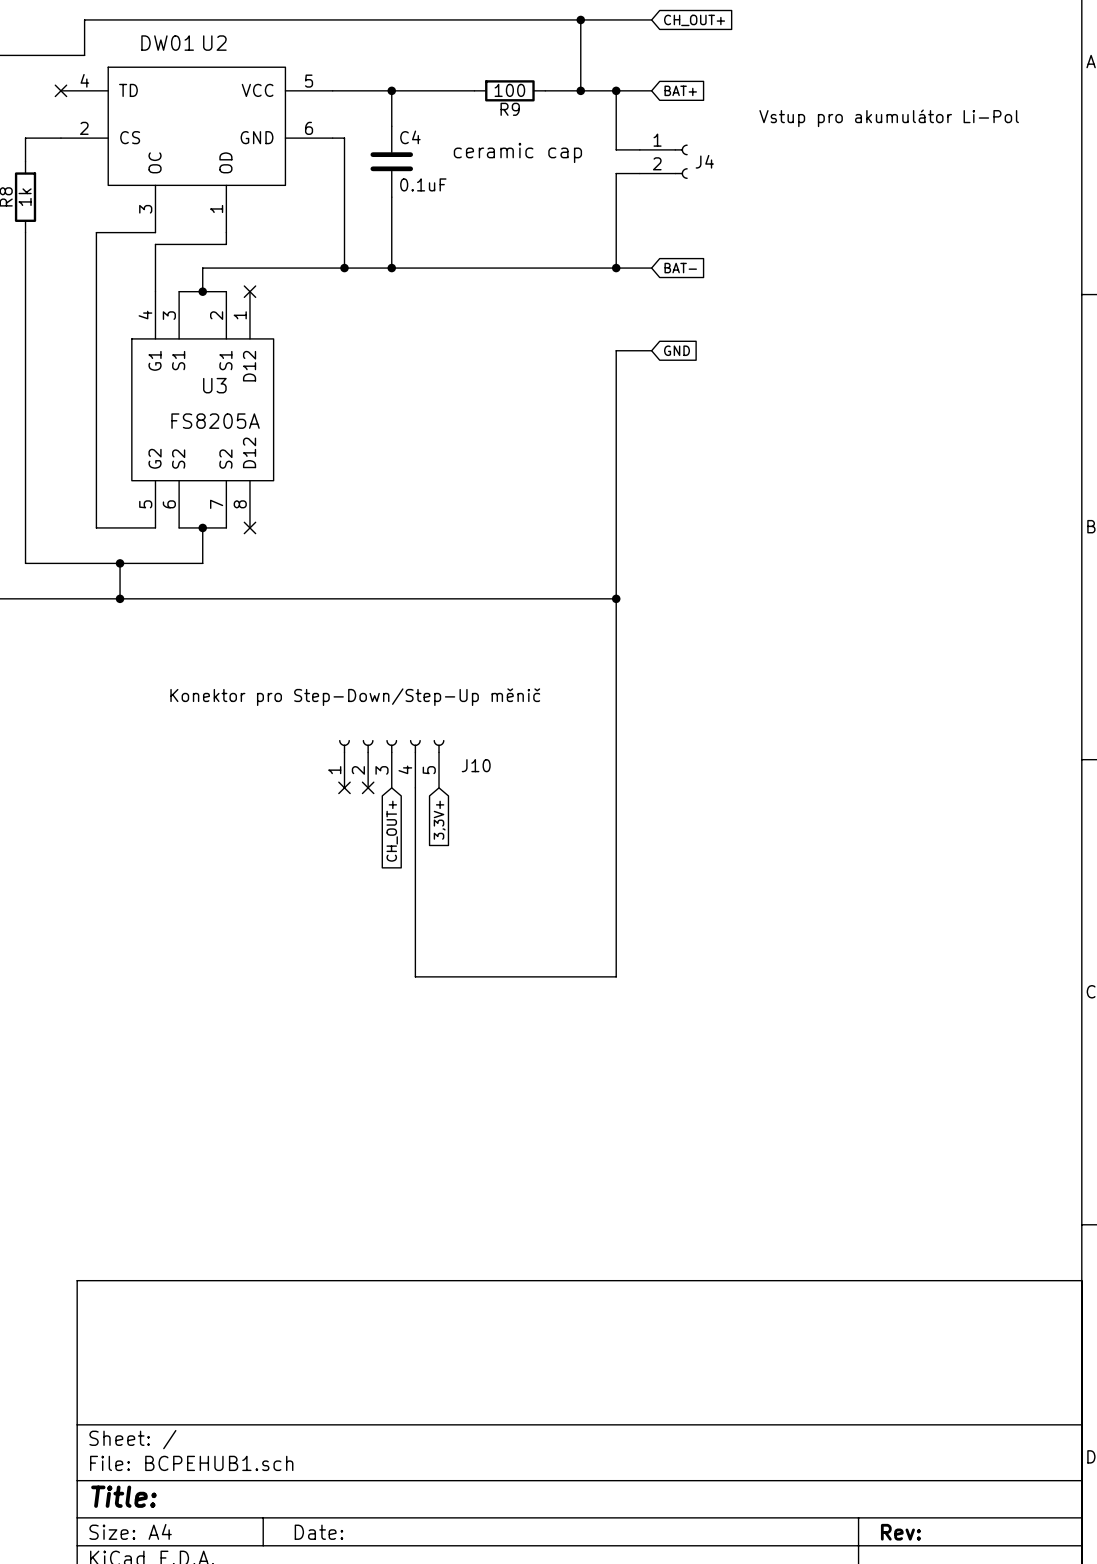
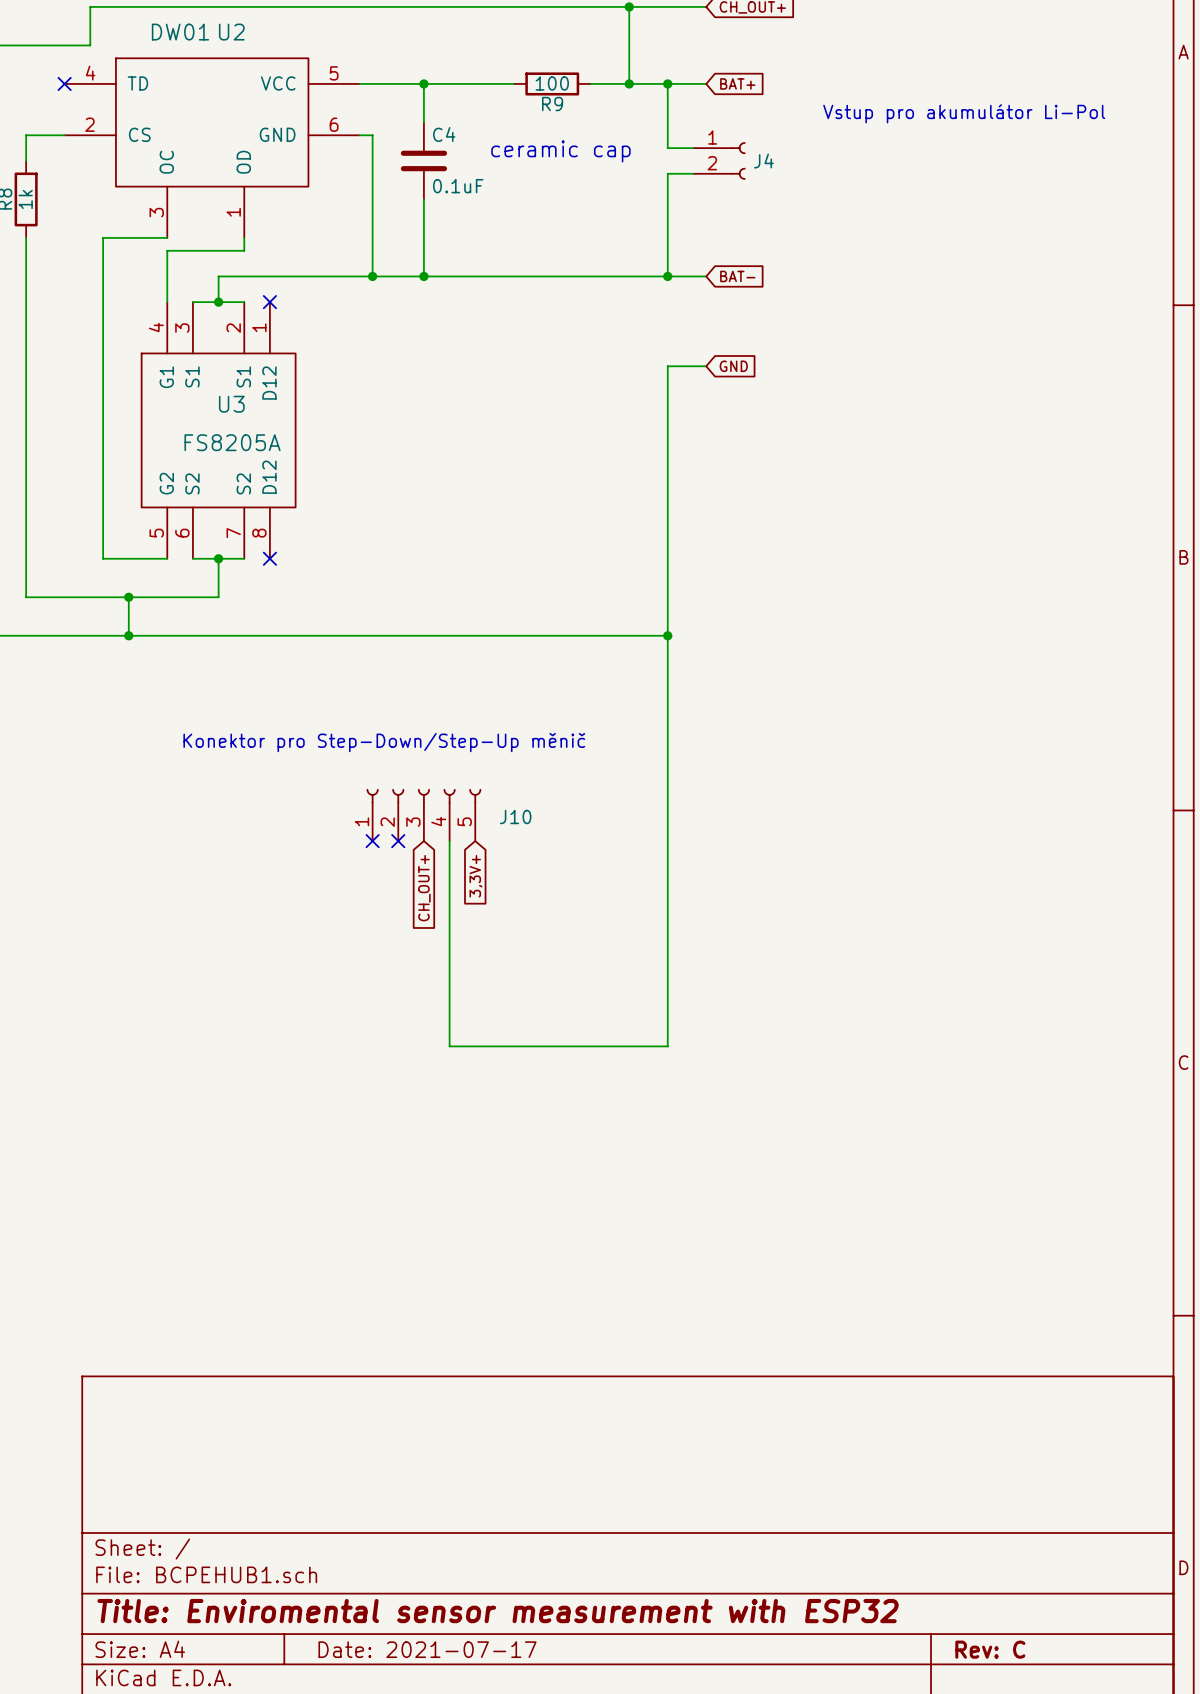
title block: Title: (123, 1496) -> Title: Enviromental sensor measurement with ESP32 (498, 1611)
title block: Date: (318, 1532) -> Date: 2021-07-17 (427, 1649)
title block: Rev: (900, 1532) -> Rev: C (990, 1649)

